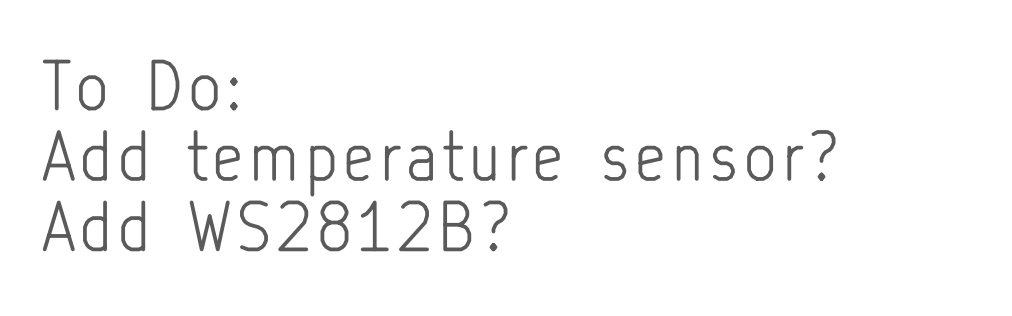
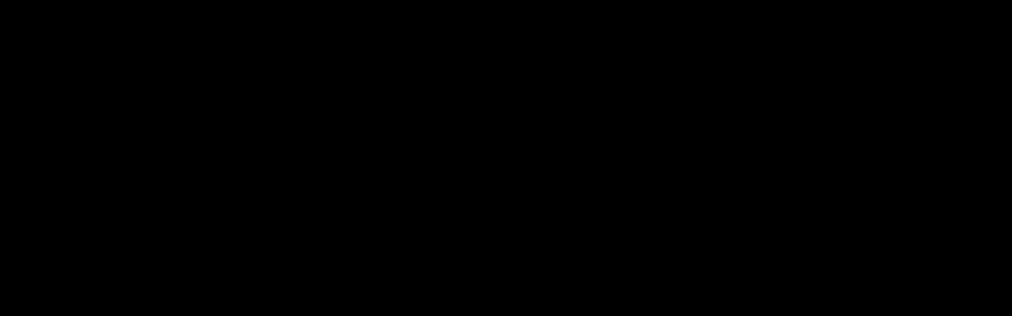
text: To Do: (140, 85) -> none
text: Add temperature sensor? (439, 163) -> none
text: Add WS2812B? (275, 225) -> none

